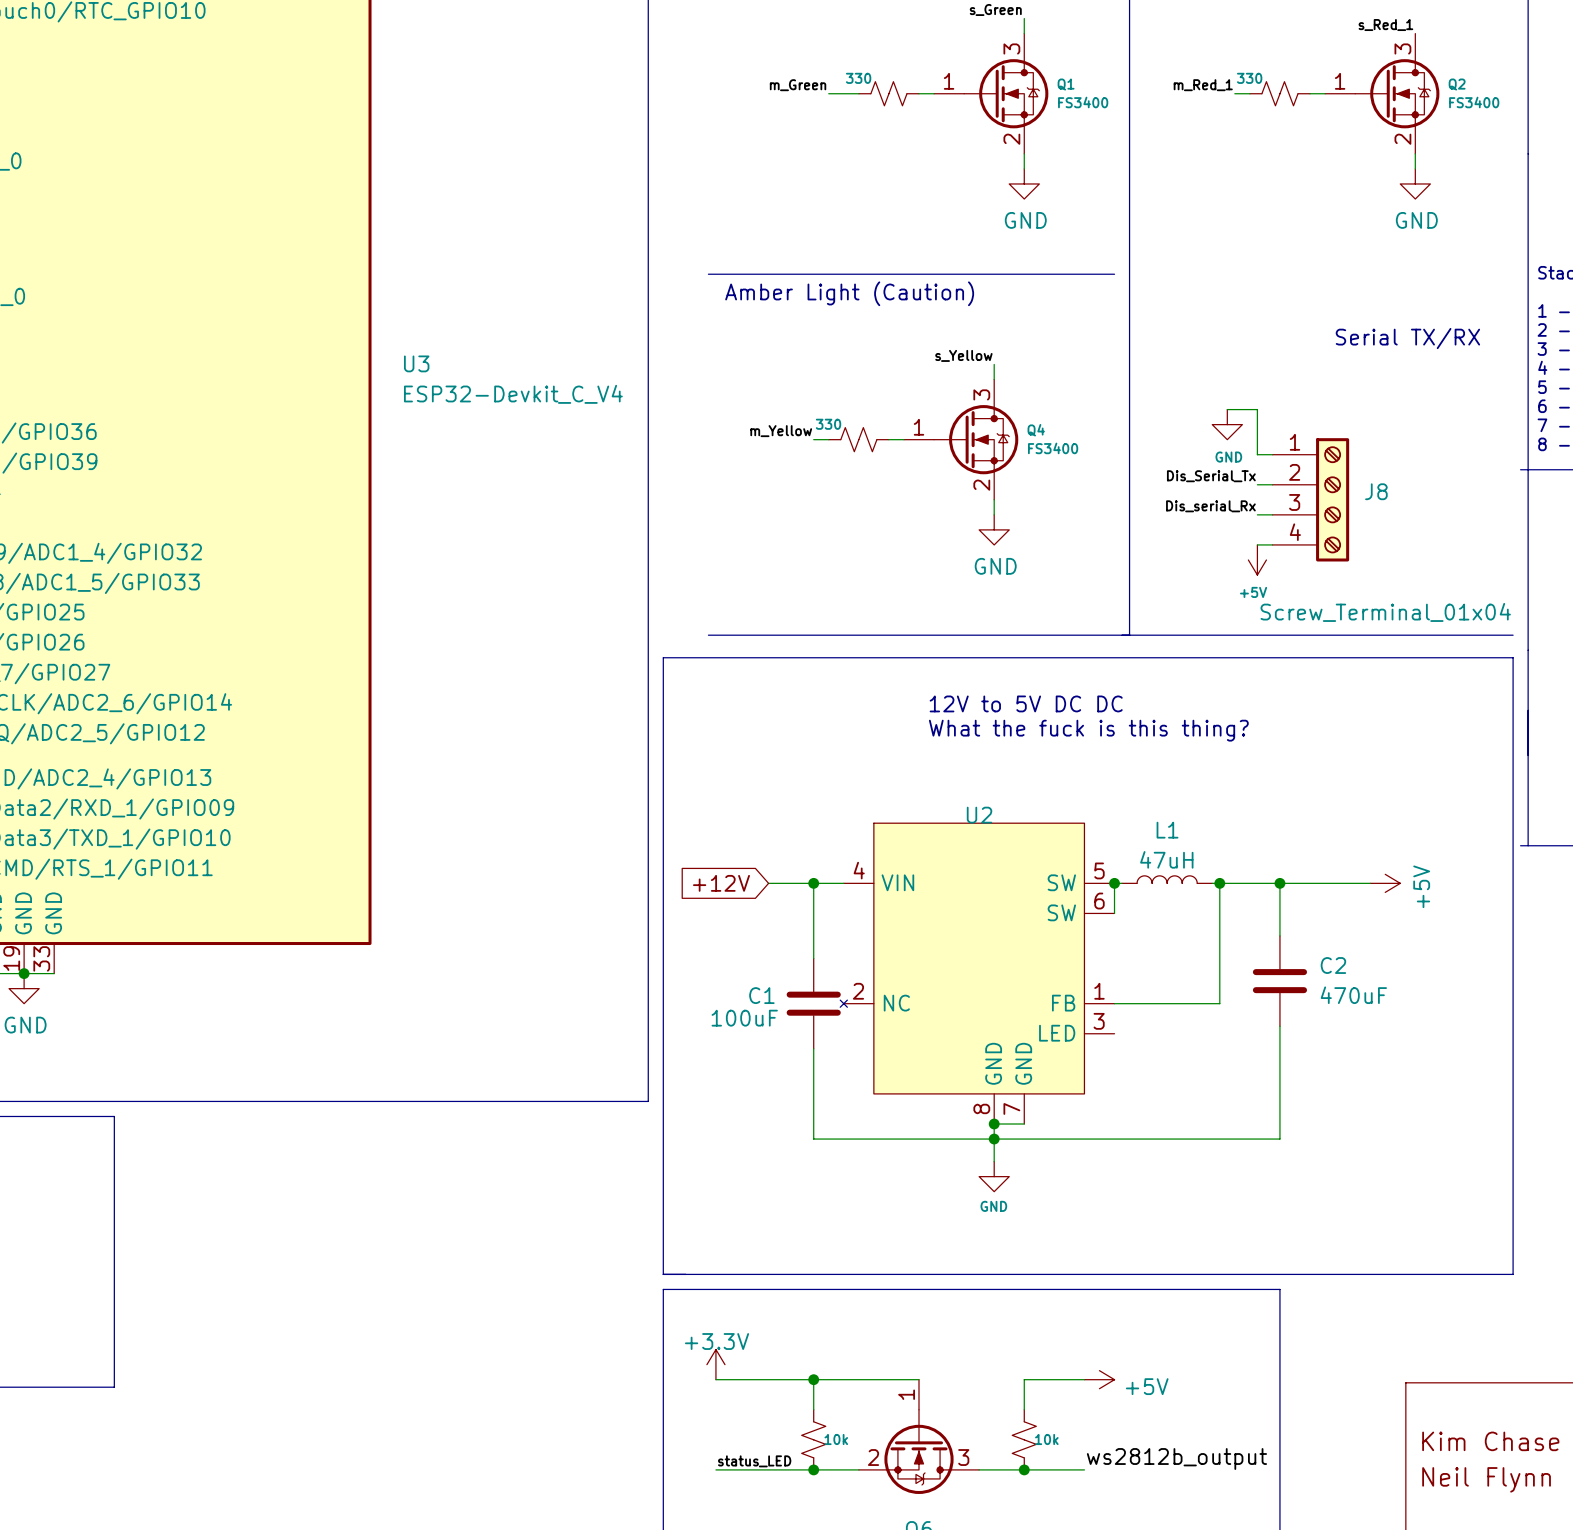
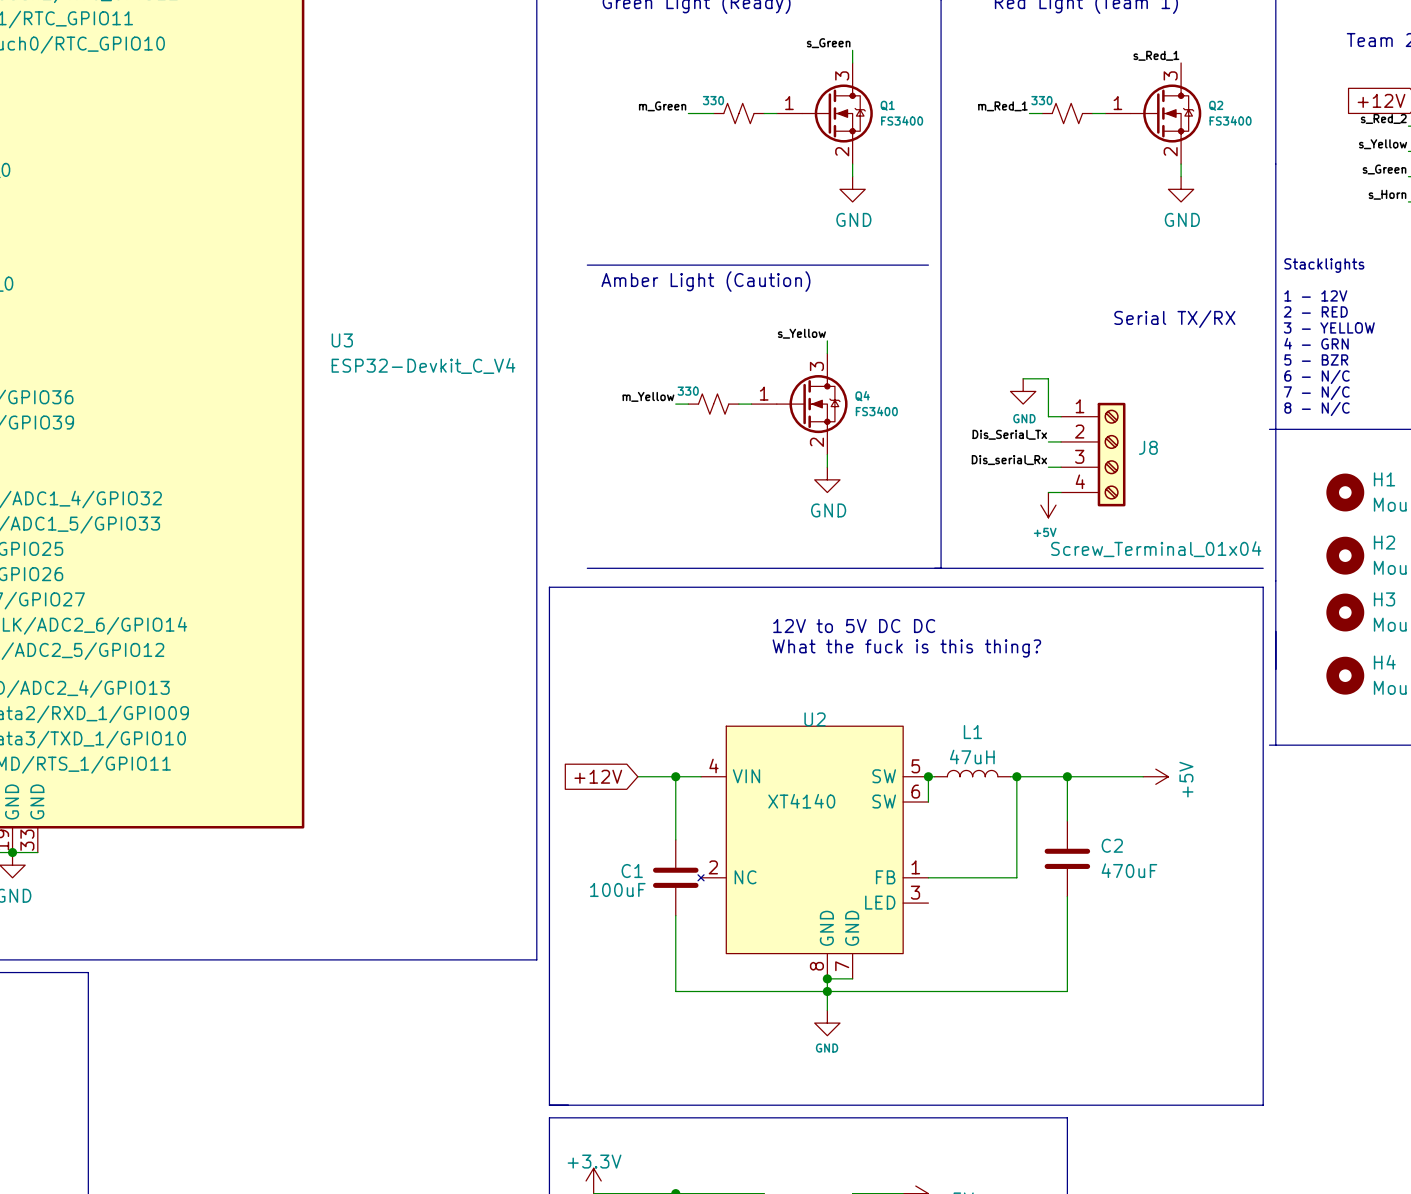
U2 value: none -> XT4140 (801, 801)

